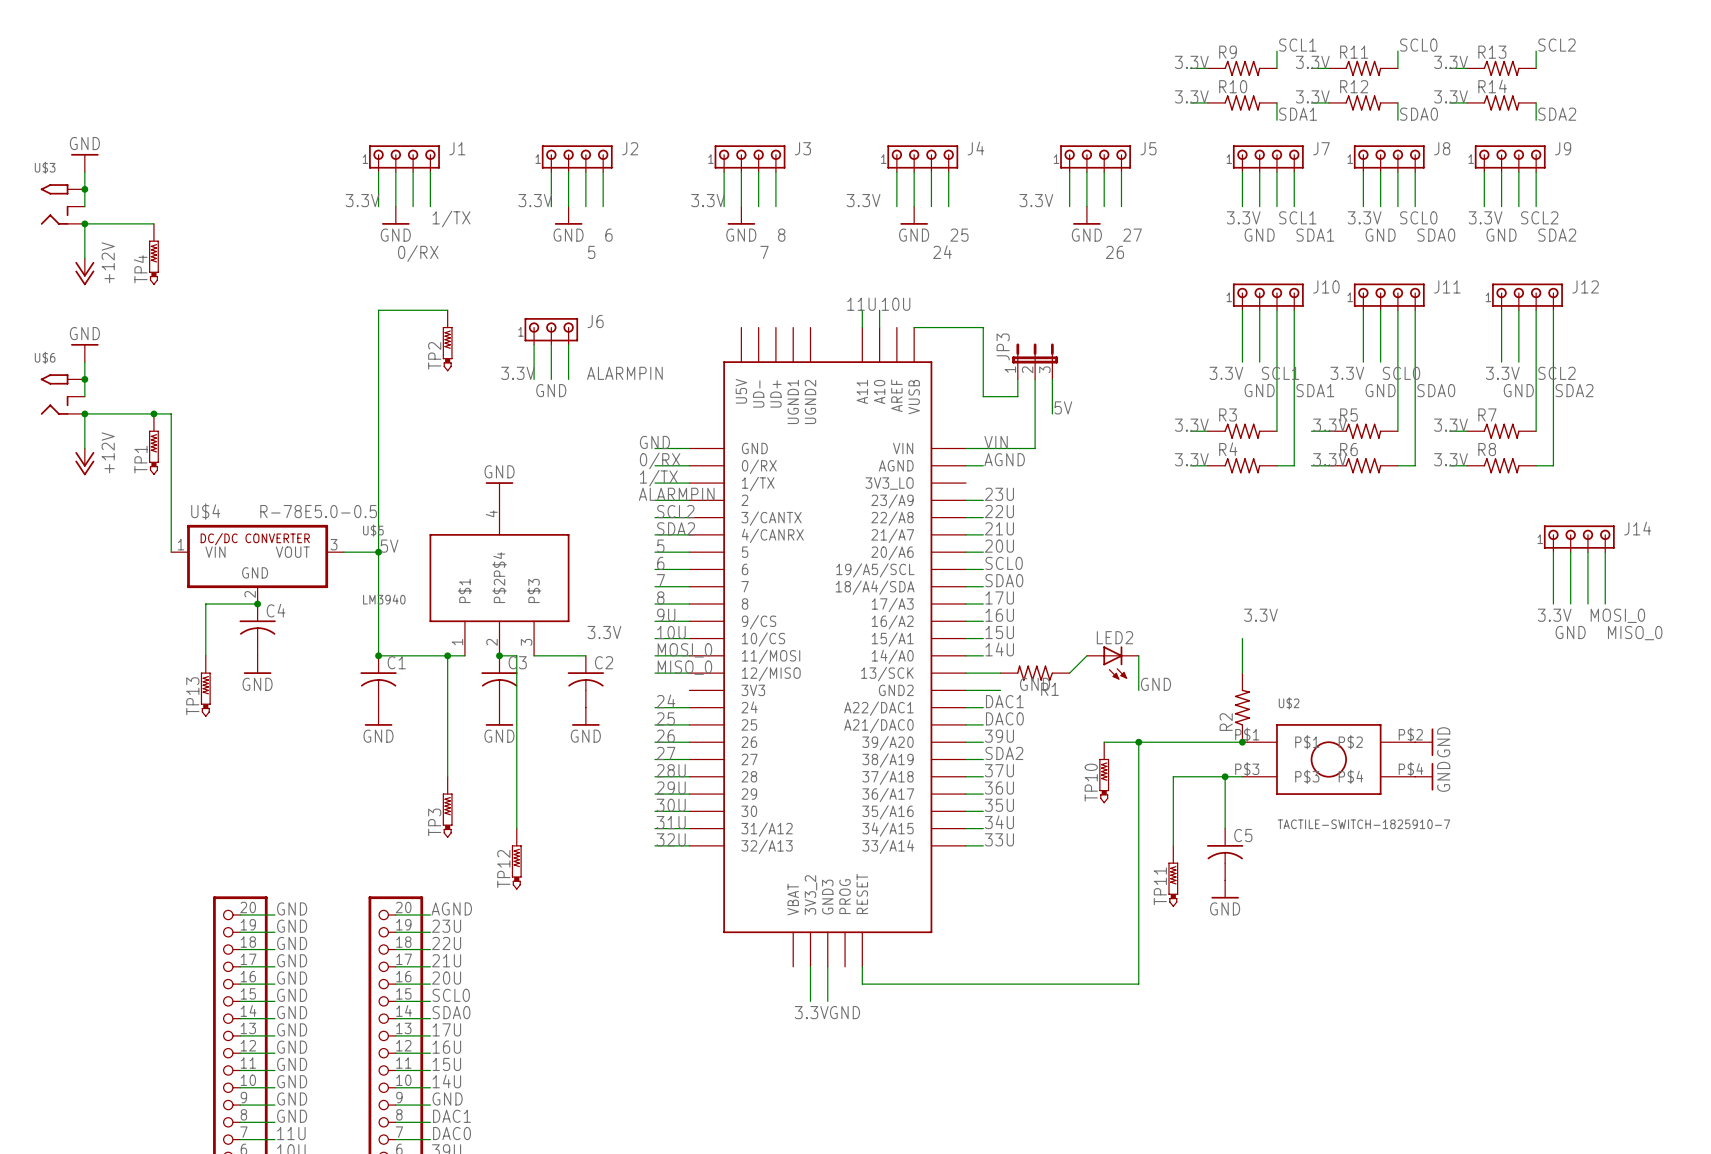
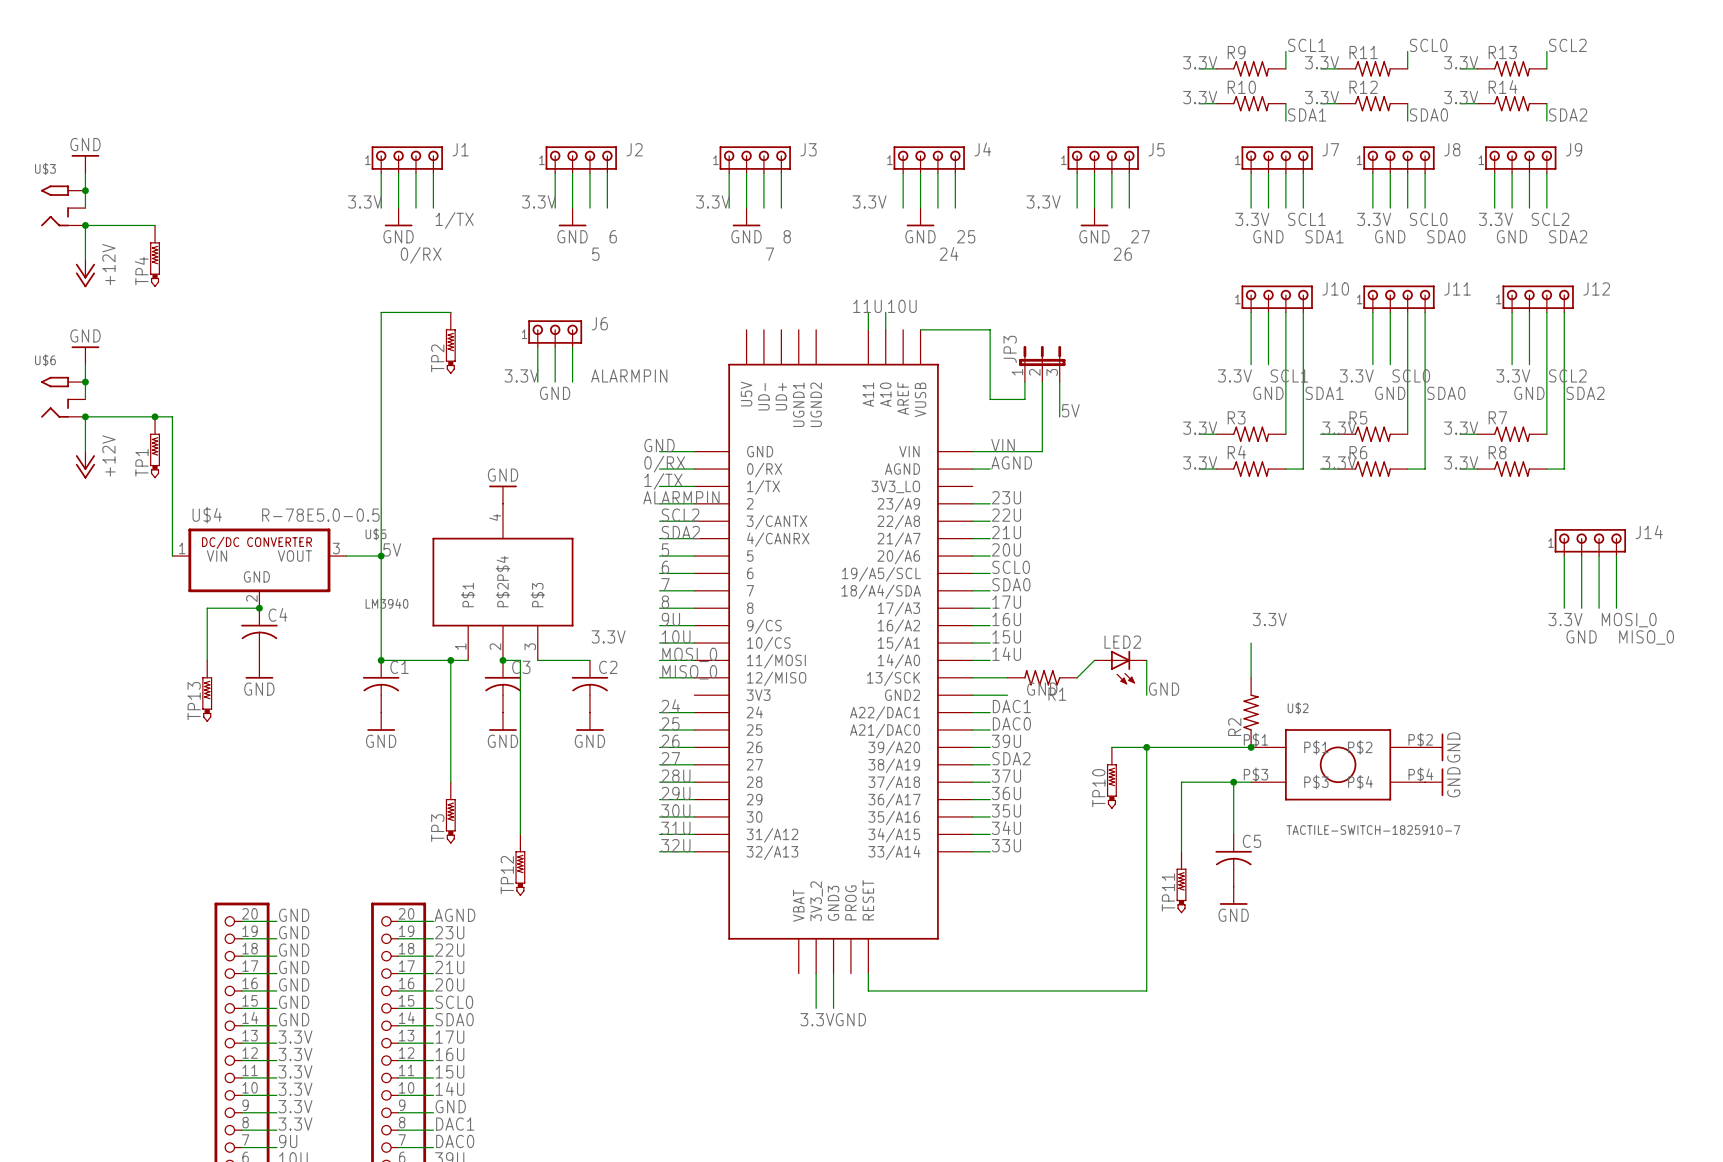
label: GND (292, 1029) -> 3.3V (295, 1037)
label: GND (292, 1047) -> 3.3V (295, 1054)
label: GND (292, 1064) -> 3.3V (295, 1071)
label: GND (292, 1081) -> 3.3V (295, 1089)
label: GND (292, 1098) -> 3.3V (295, 1106)
label: GND (292, 1116) -> 3.3V (295, 1124)
label: 11U (291, 1133) -> 9U (288, 1141)

